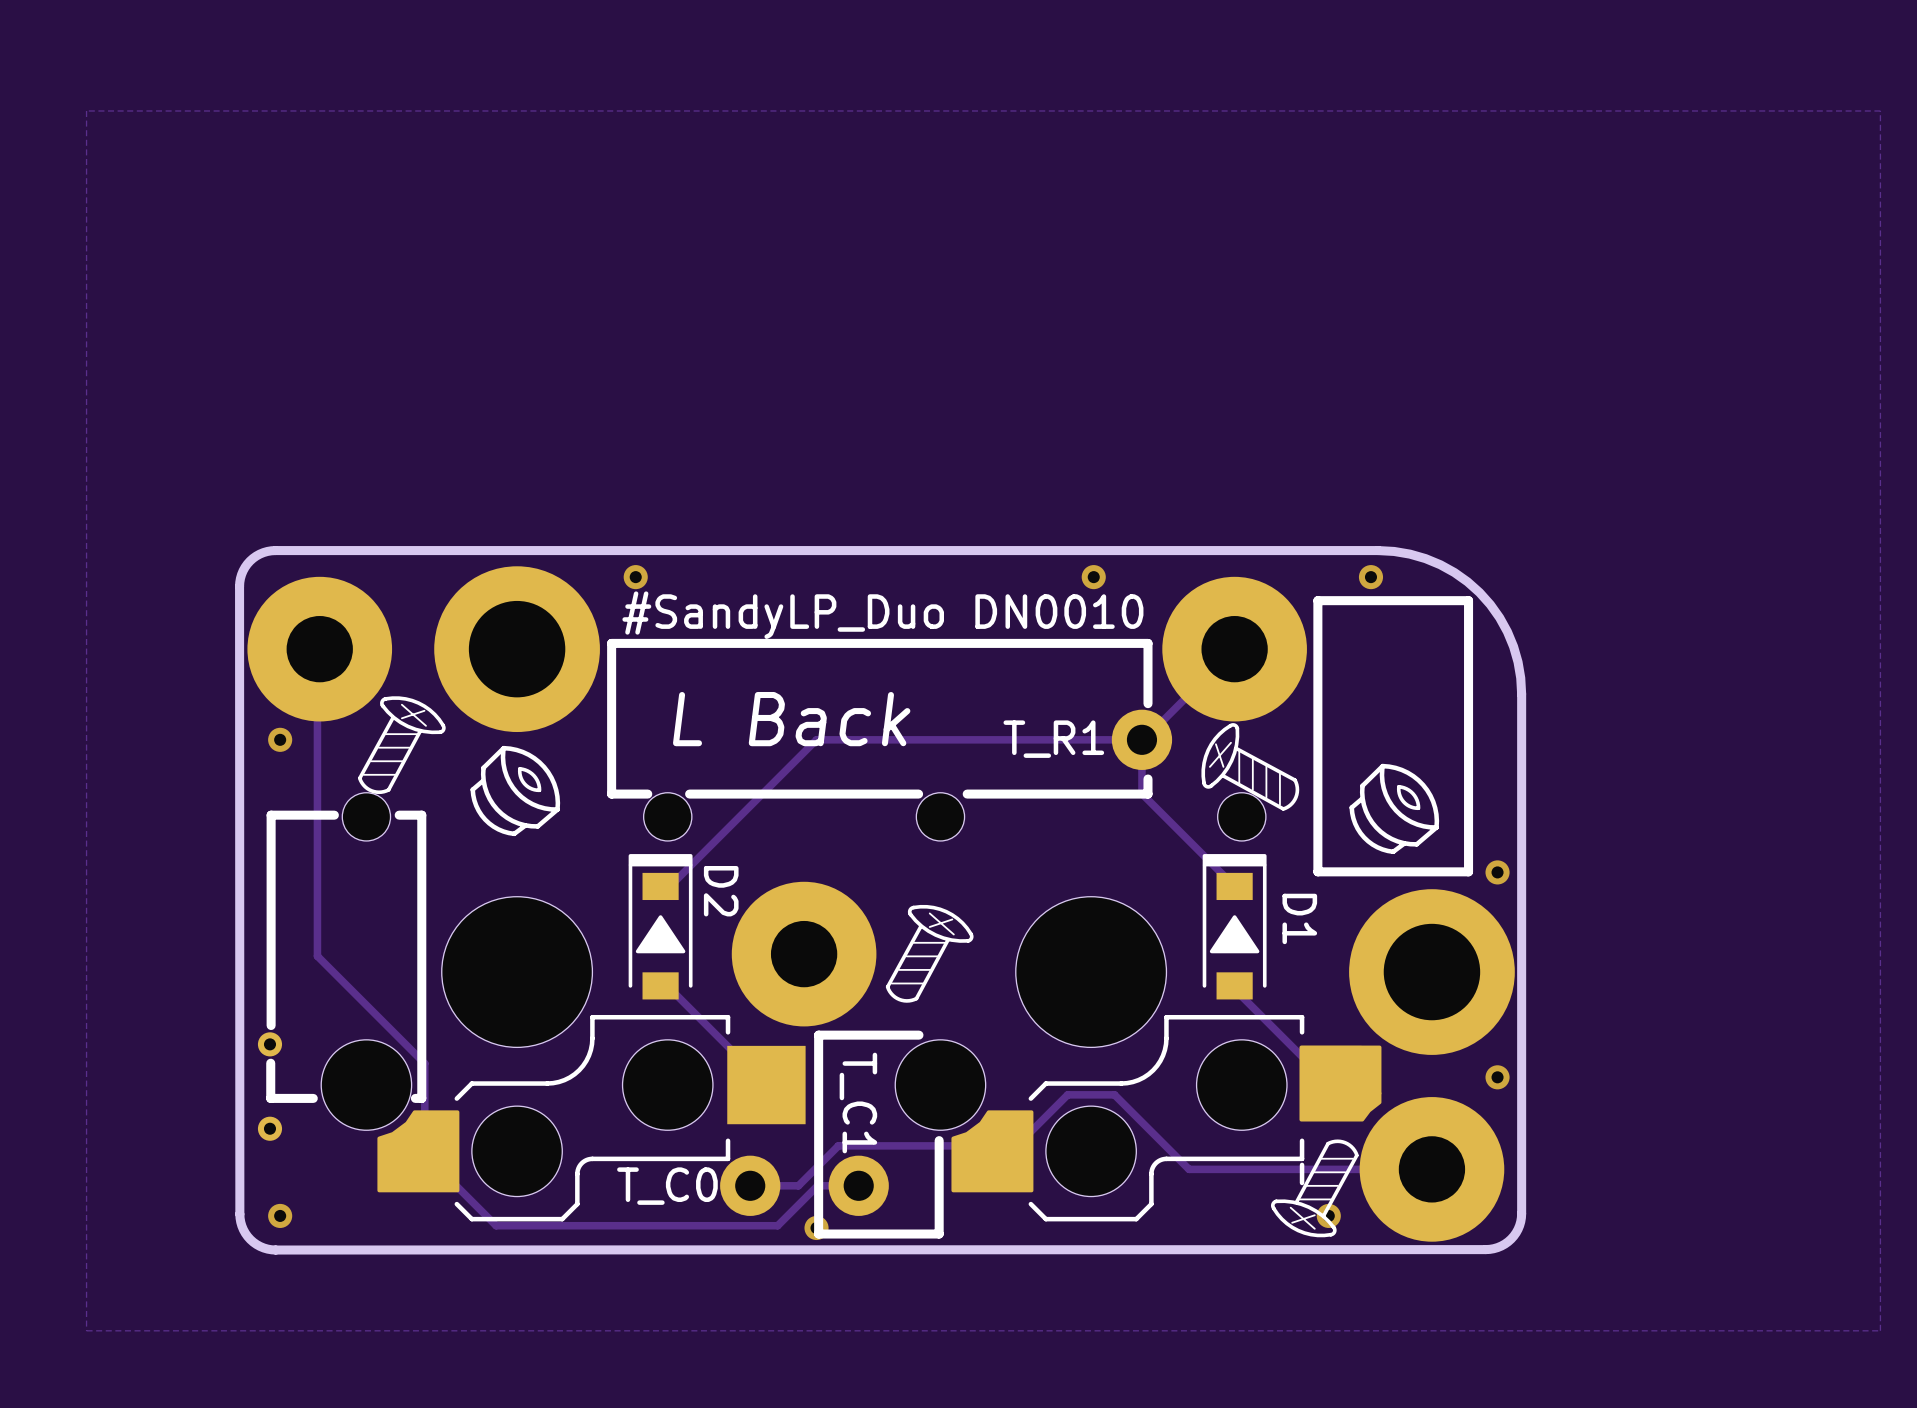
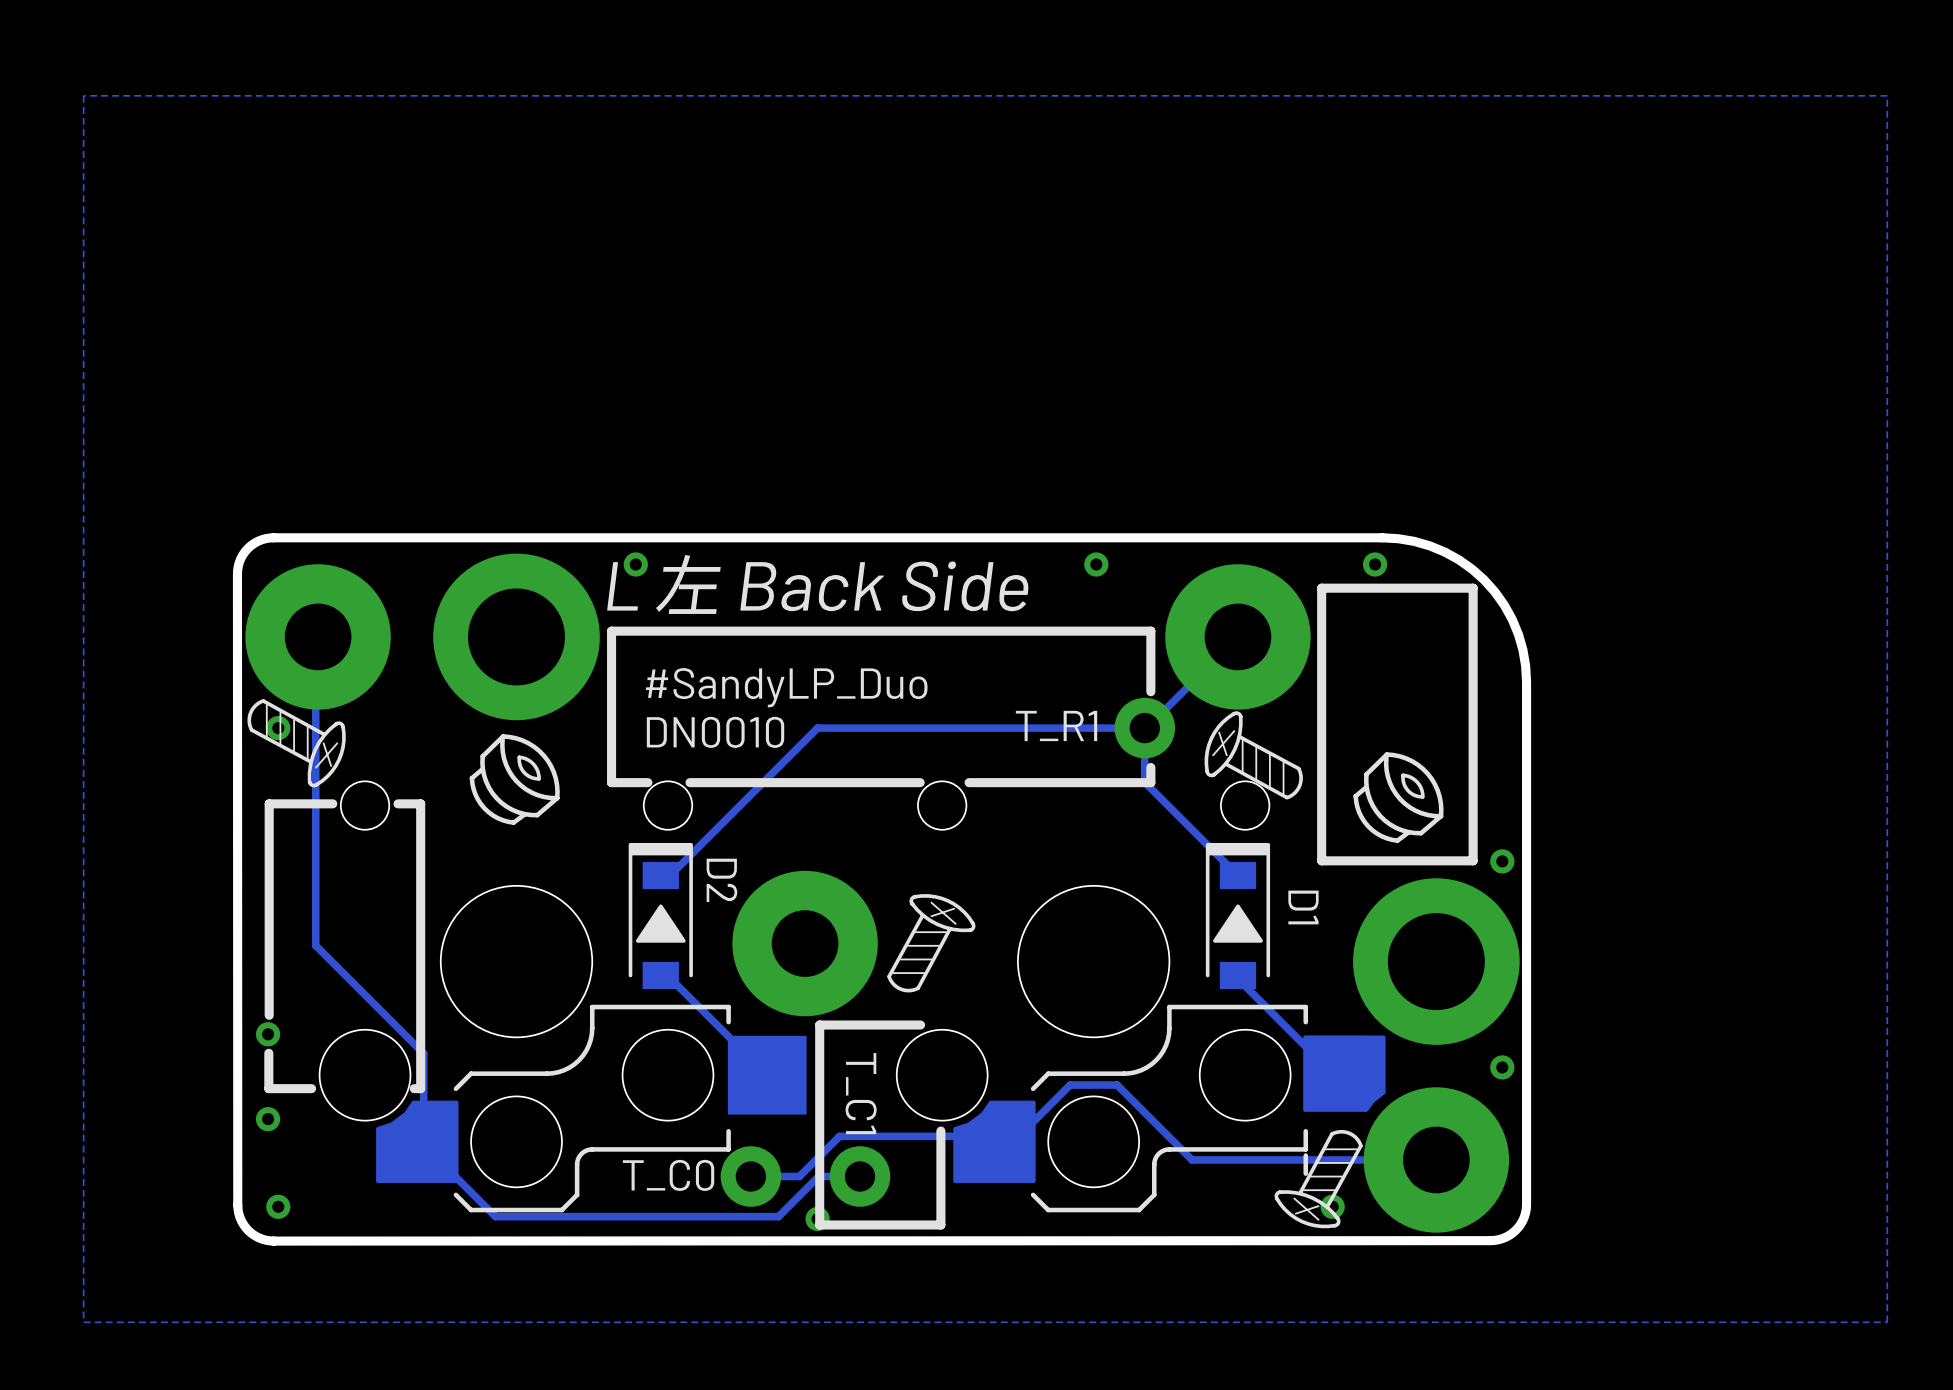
text: #SandyLP_Duo DN0010 (882, 615) -> L 左 Back Side (817, 584)
drawing: [357, 696, 446, 795] -> none
text: none -> #SandyLP_Duo (786, 687)
drawing: none -> [247, 699, 346, 788]
text: L Back (791, 719) -> none
text: none -> DN0010 (715, 732)

